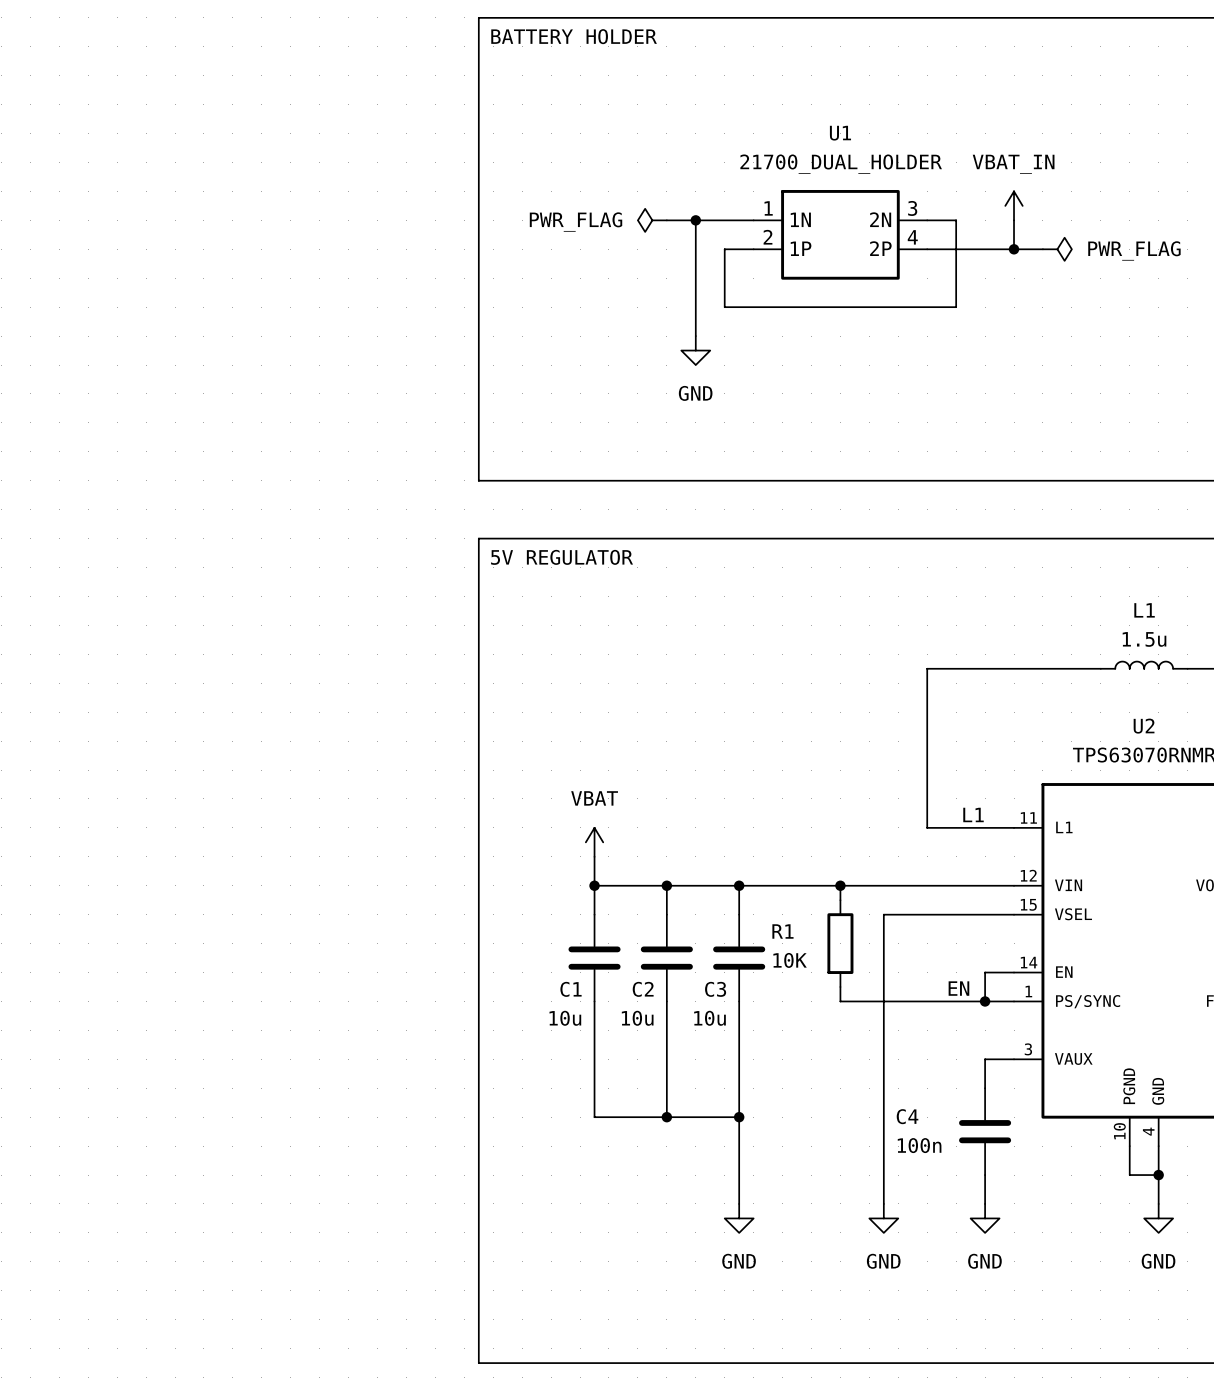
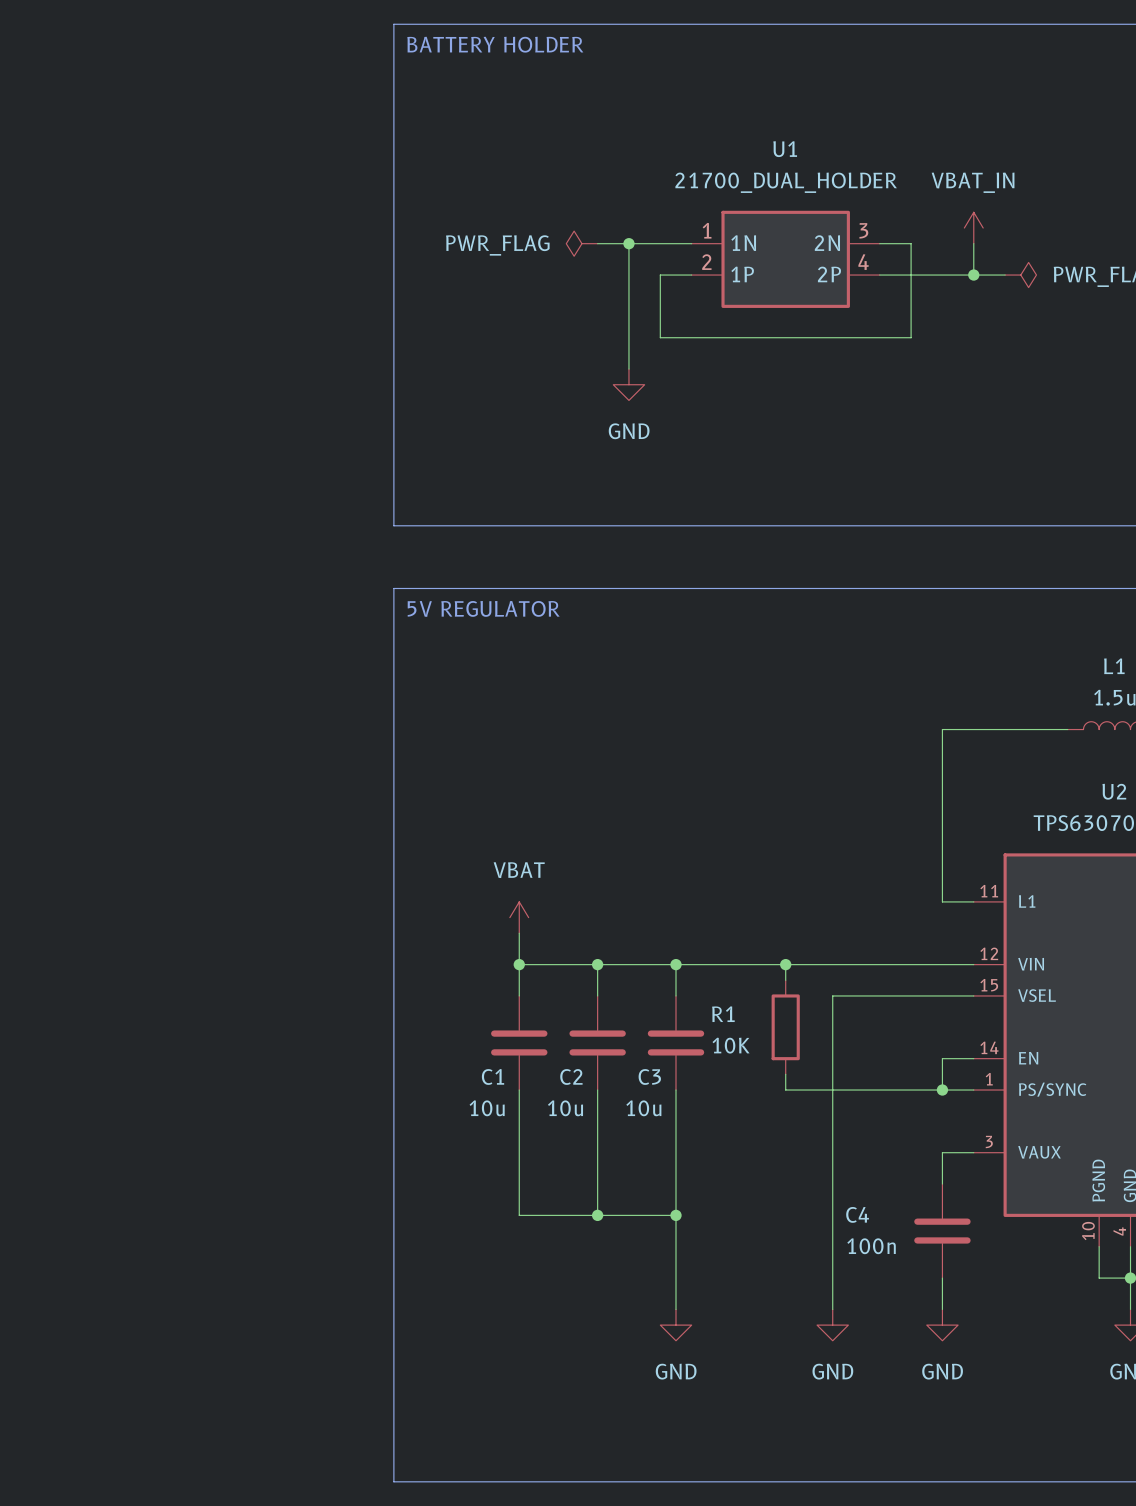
wire: (985, 668) (927, 668) (927, 827) (985, 827) -> (942, 729) (942, 901)
label: L1 (973, 814) -> none
label: EN (958, 988) -> none

